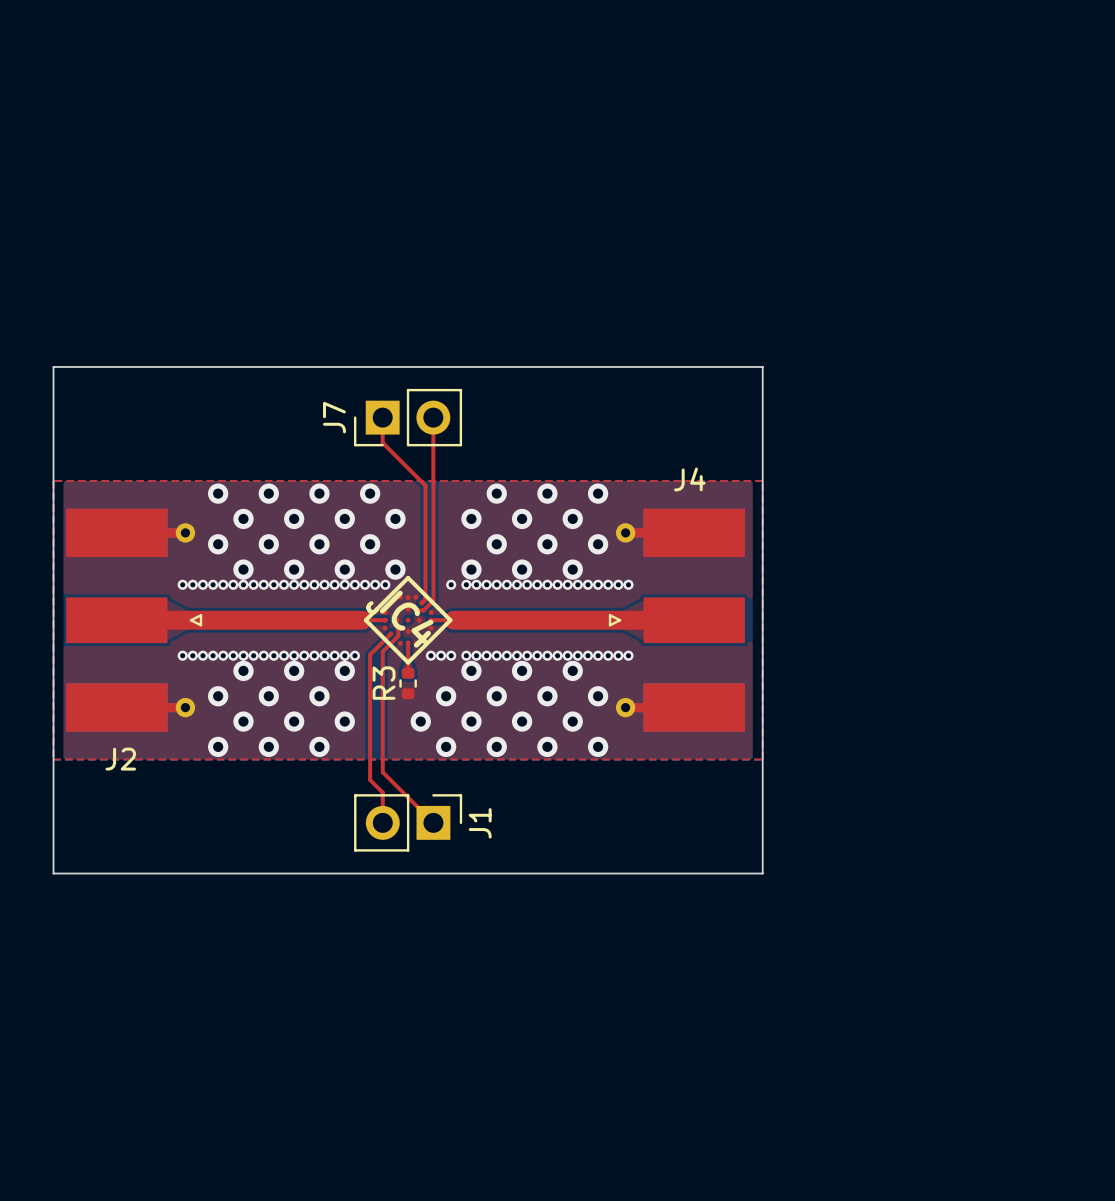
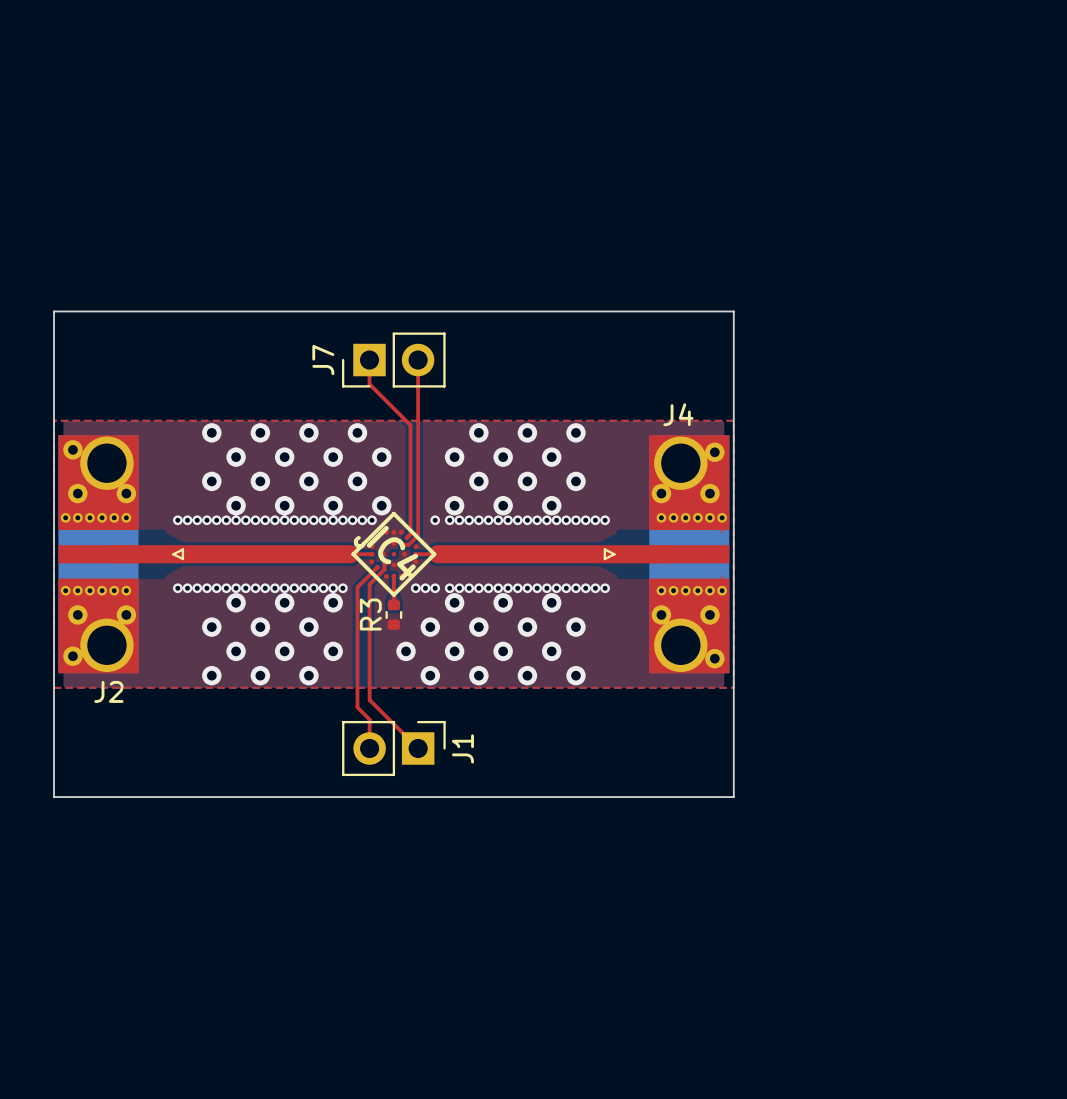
J2 footprint: [66, 508, 203, 732] -> [58, 435, 185, 674]
J4 footprint: [608, 508, 745, 732] -> [603, 435, 730, 674]

